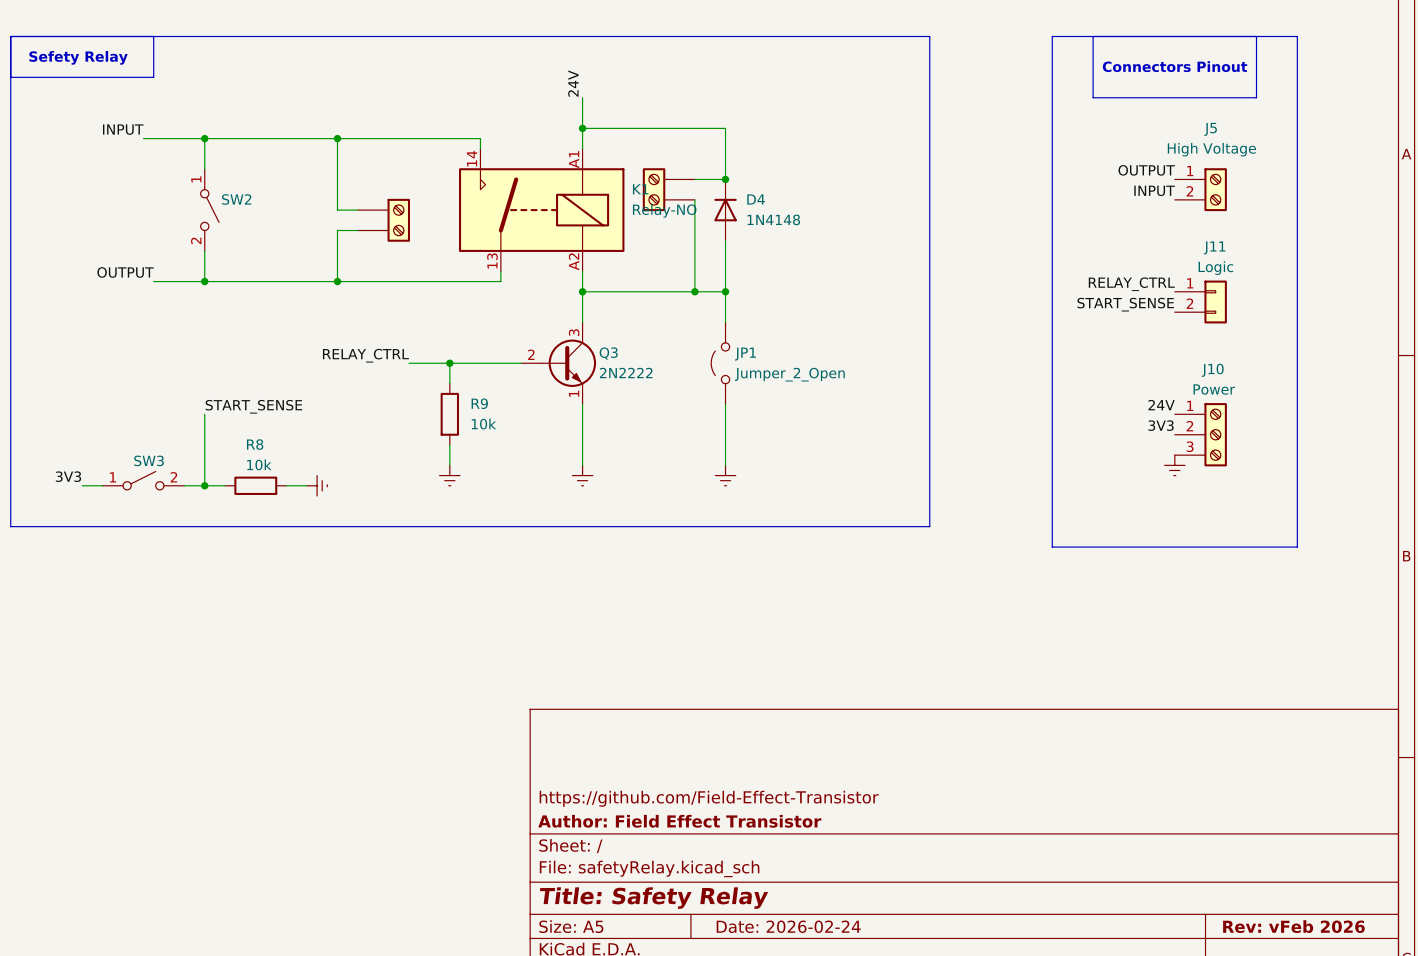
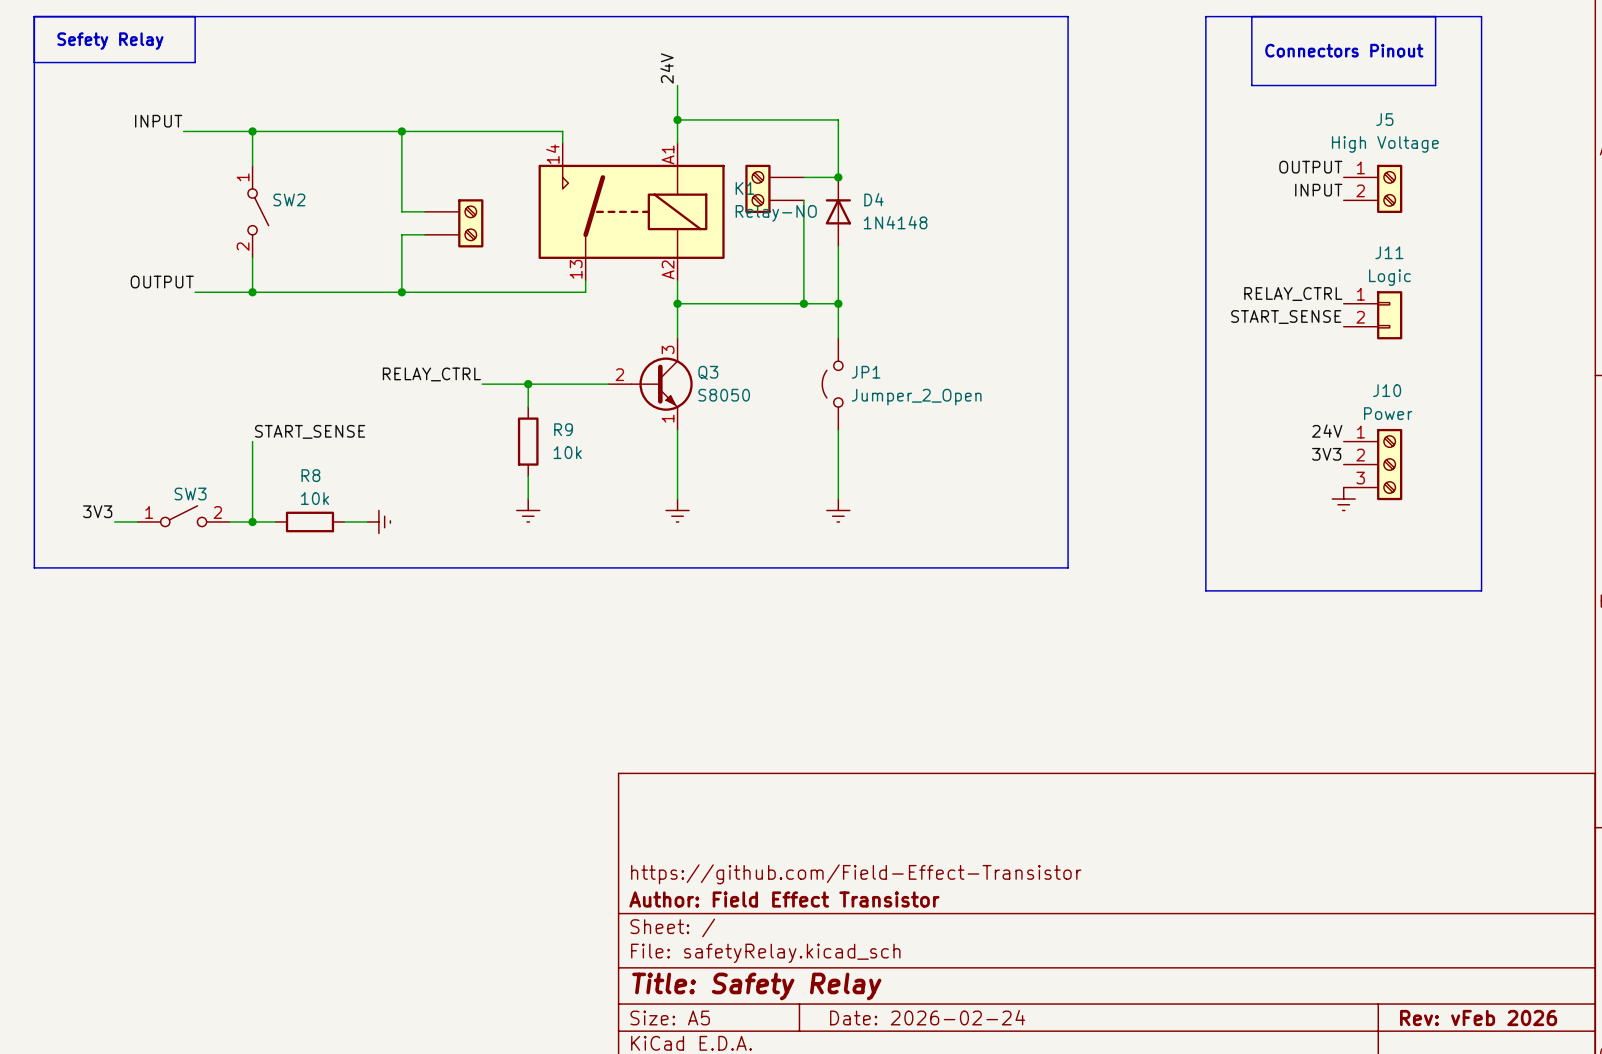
Q3 value: 2N2222 (626, 372) -> S8050 (724, 395)

